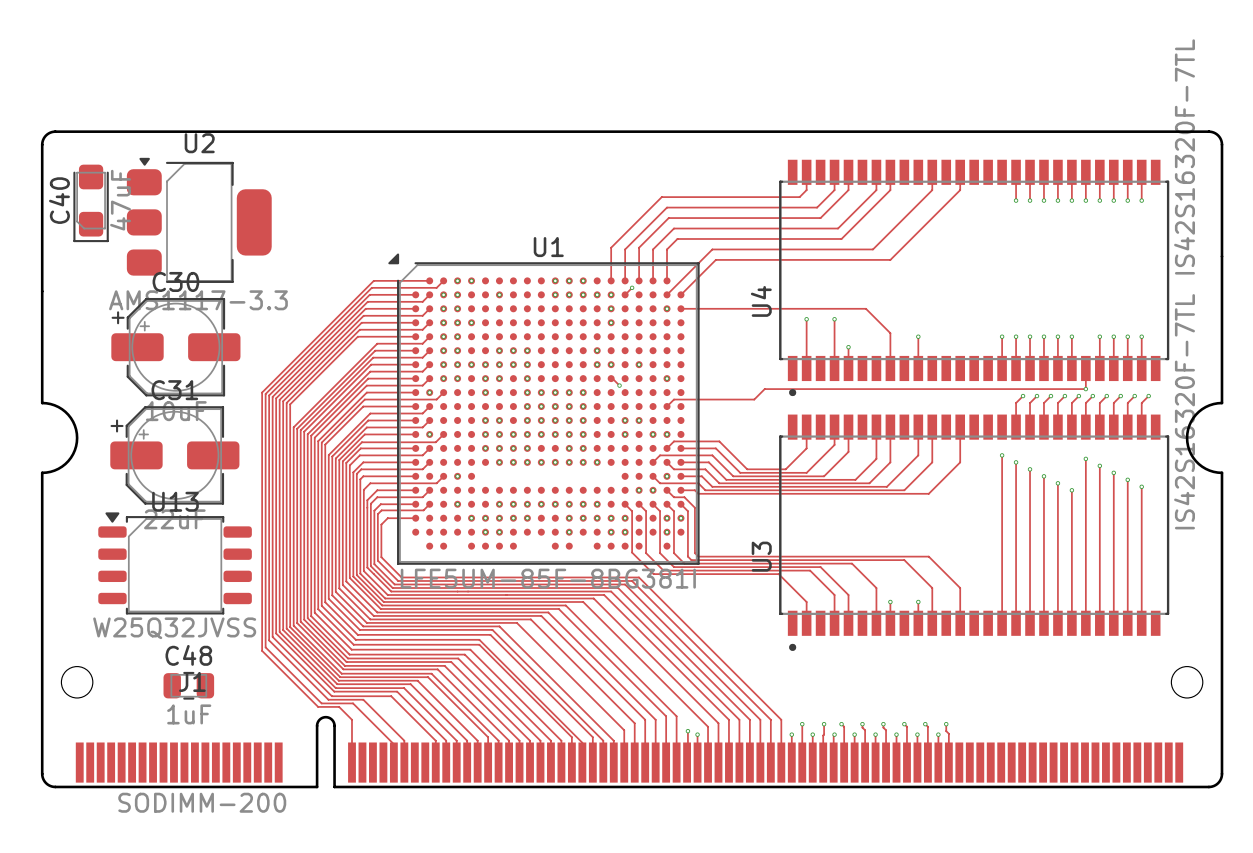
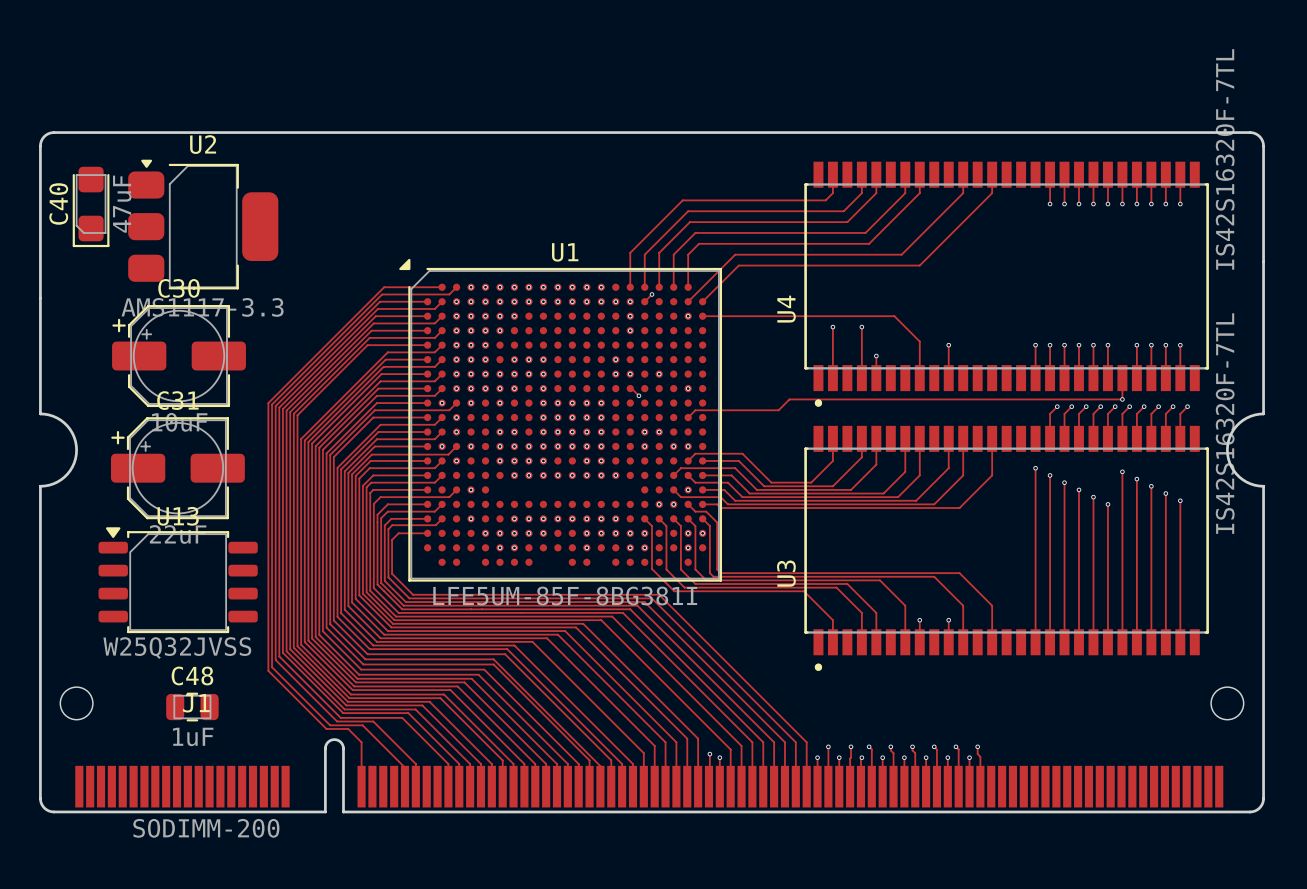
via: none -> (500, 287)
via: none -> (514, 287)
via: none -> (528, 287)
via: none -> (543, 287)
via: none -> (557, 287)
via: none -> (485, 301)
via: none -> (500, 301)
via: none -> (528, 301)
via: none -> (543, 301)
via: none -> (557, 301)
via: none -> (485, 316)
via: none -> (500, 316)
via: none -> (514, 316)
via: none -> (500, 330)
via: none -> (485, 345)
via: none -> (485, 359)
via: none -> (485, 388)
via: none -> (471, 403)
via: none -> (456, 417)
via: none -> (456, 432)
via: none -> (471, 446)
via: none -> (456, 460)

